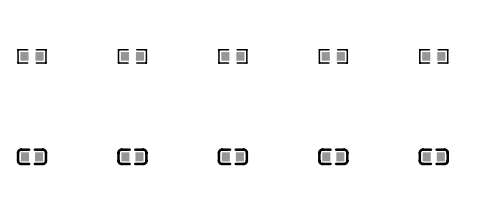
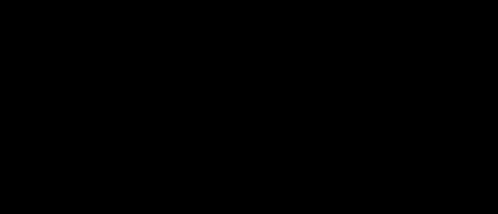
part: (32, 56) -> none
part: (132, 56) -> none
part: (232, 56) -> none
part: (333, 56) -> none
part: (433, 56) -> none
part: (32, 156) -> none
part: (132, 156) -> none
part: (232, 156) -> none
part: (333, 156) -> none
part: (433, 156) -> none

